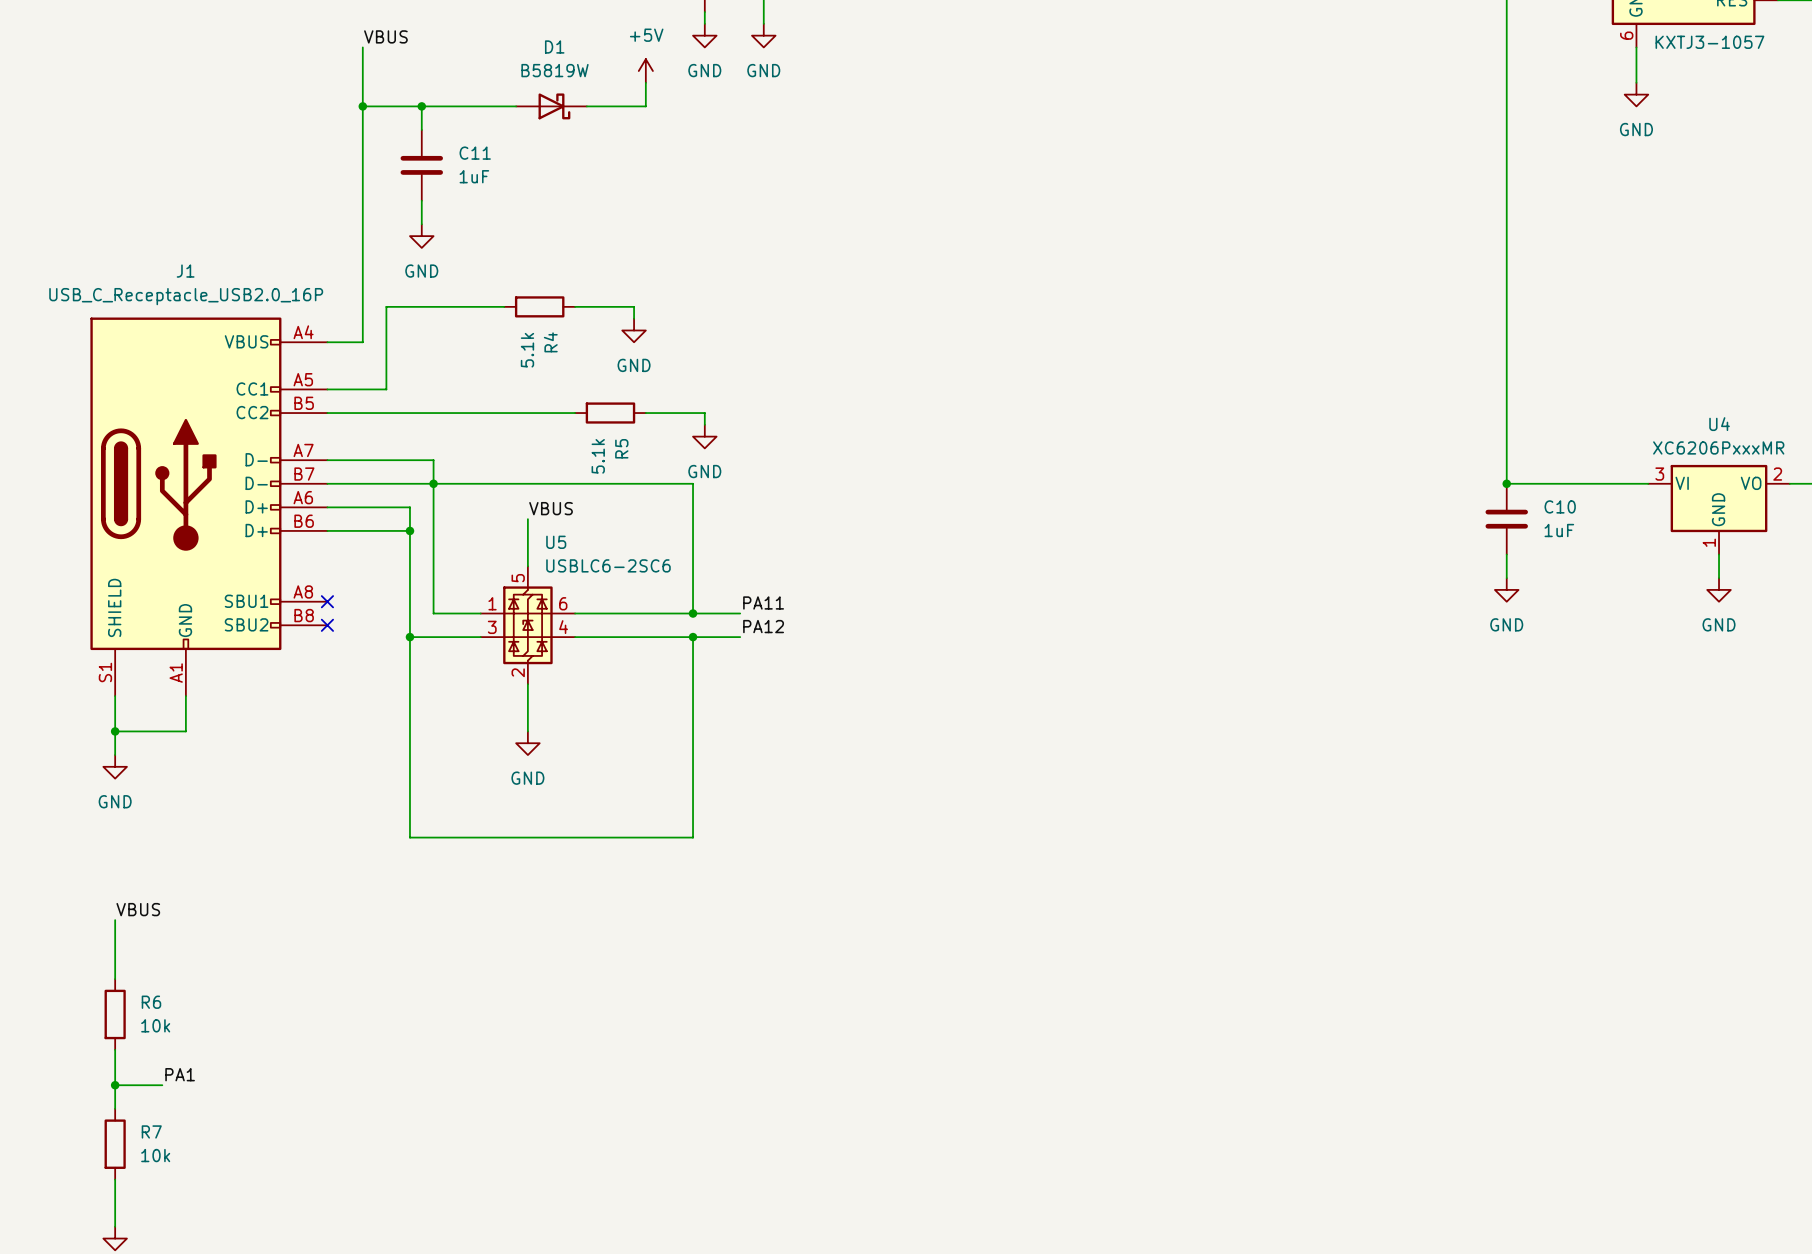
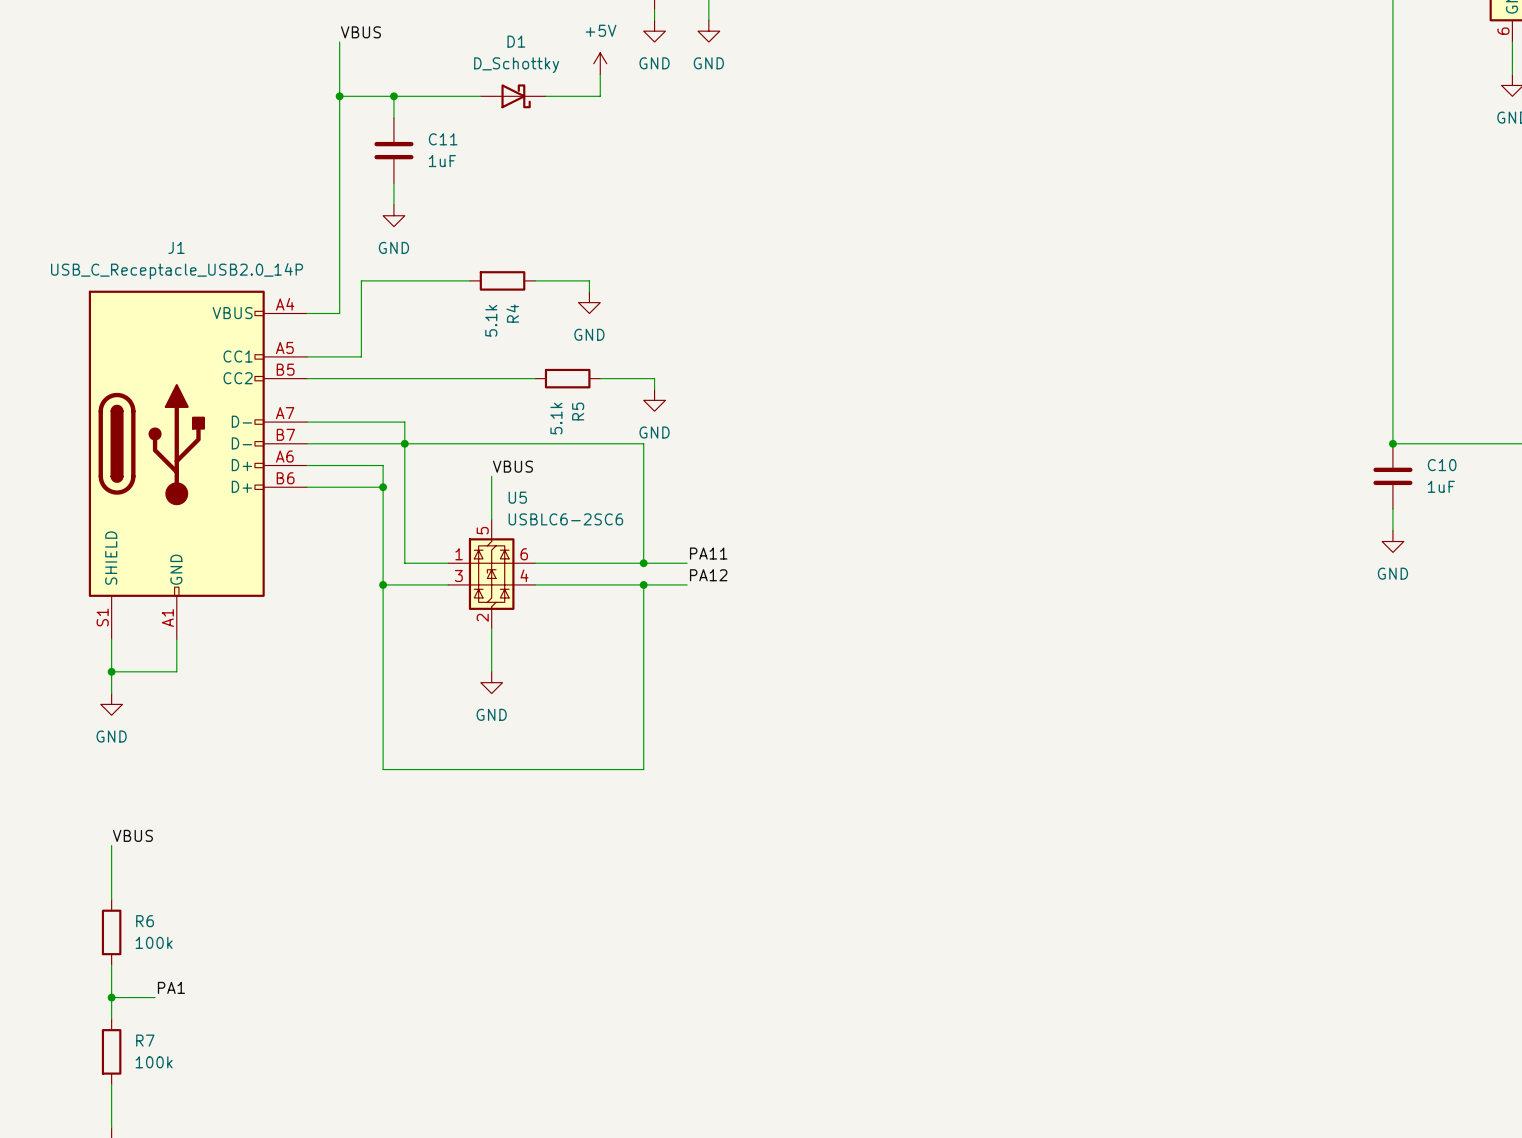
D1 value: B5819W (555, 70) -> D_Schottky (516, 65)
J1 value: USB_C_Receptacle_USB2.0_16P (186, 296) -> USB_C_Receptacle_USB2.0_14P (177, 271)
J1 symbol: [90, 317, 328, 697] -> [88, 290, 308, 640]
no-connect mark: (327, 601) -> none
no-connect mark: (327, 625) -> none
R6 value: 10k (155, 1025) -> 100k (154, 942)
R7 value: 10k (155, 1155) -> 100k (154, 1062)

